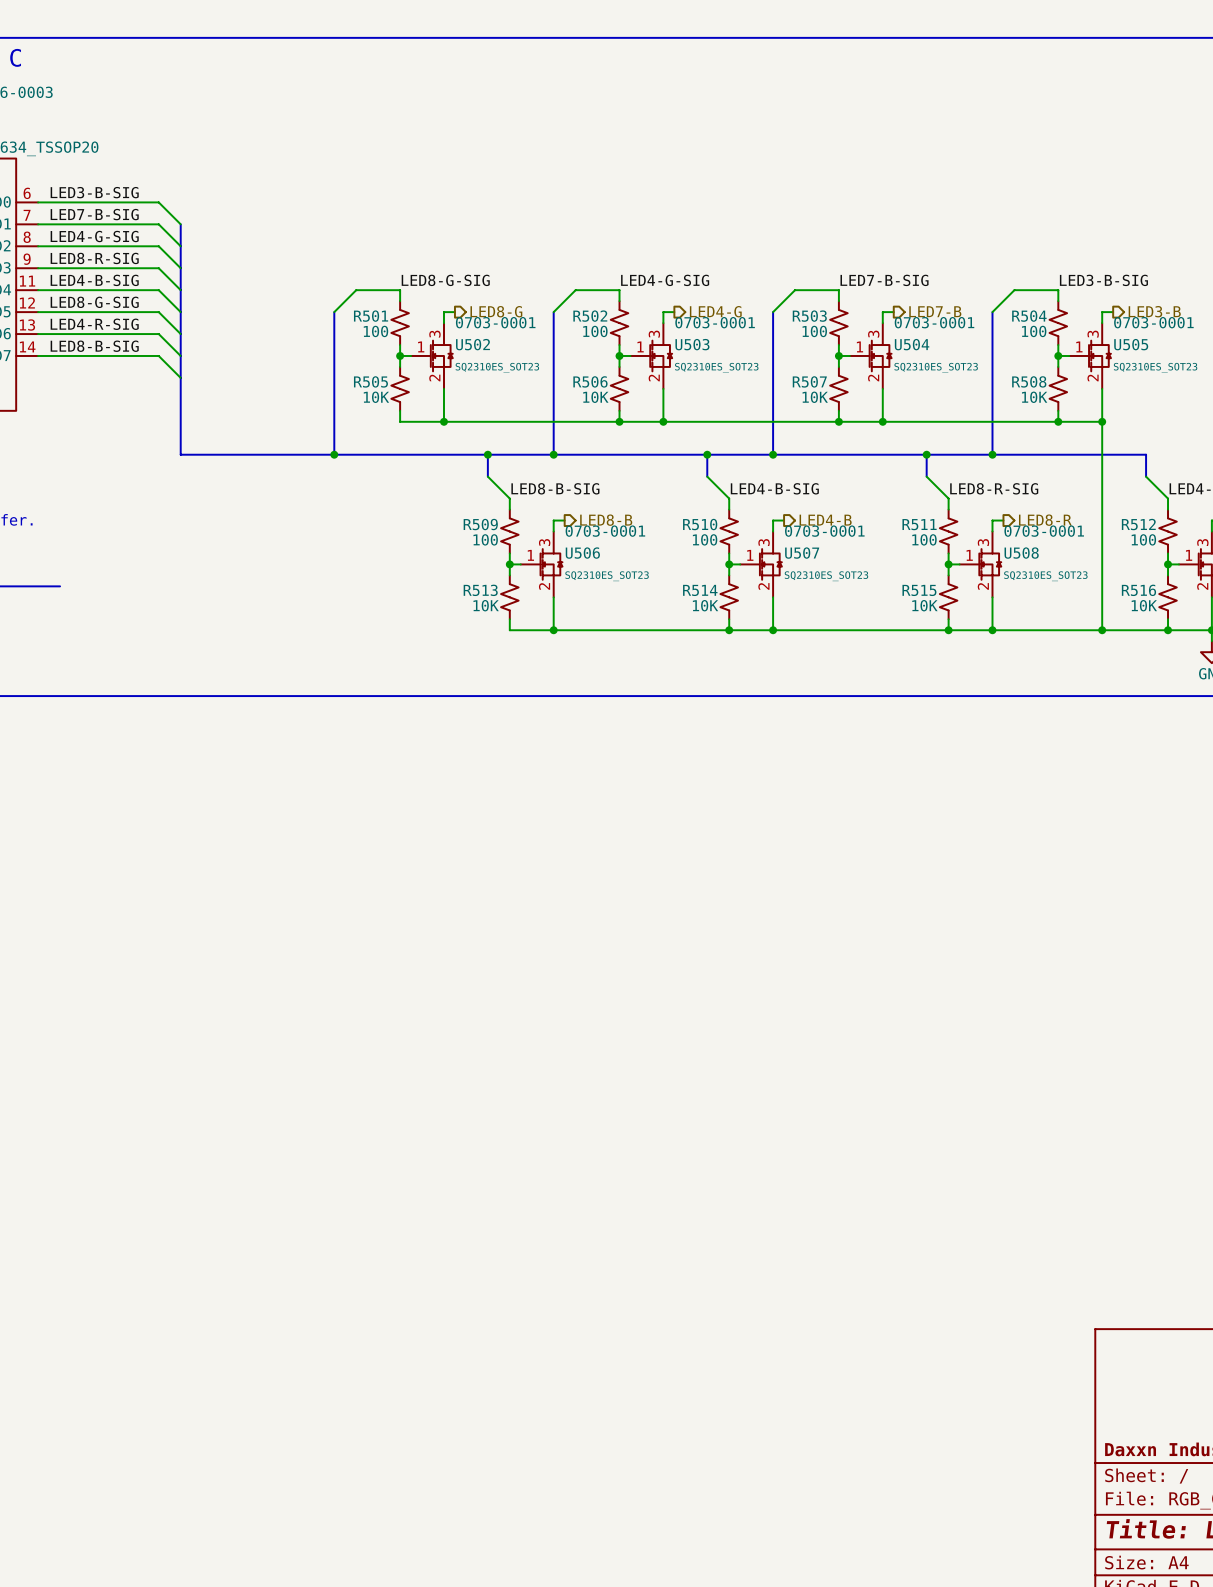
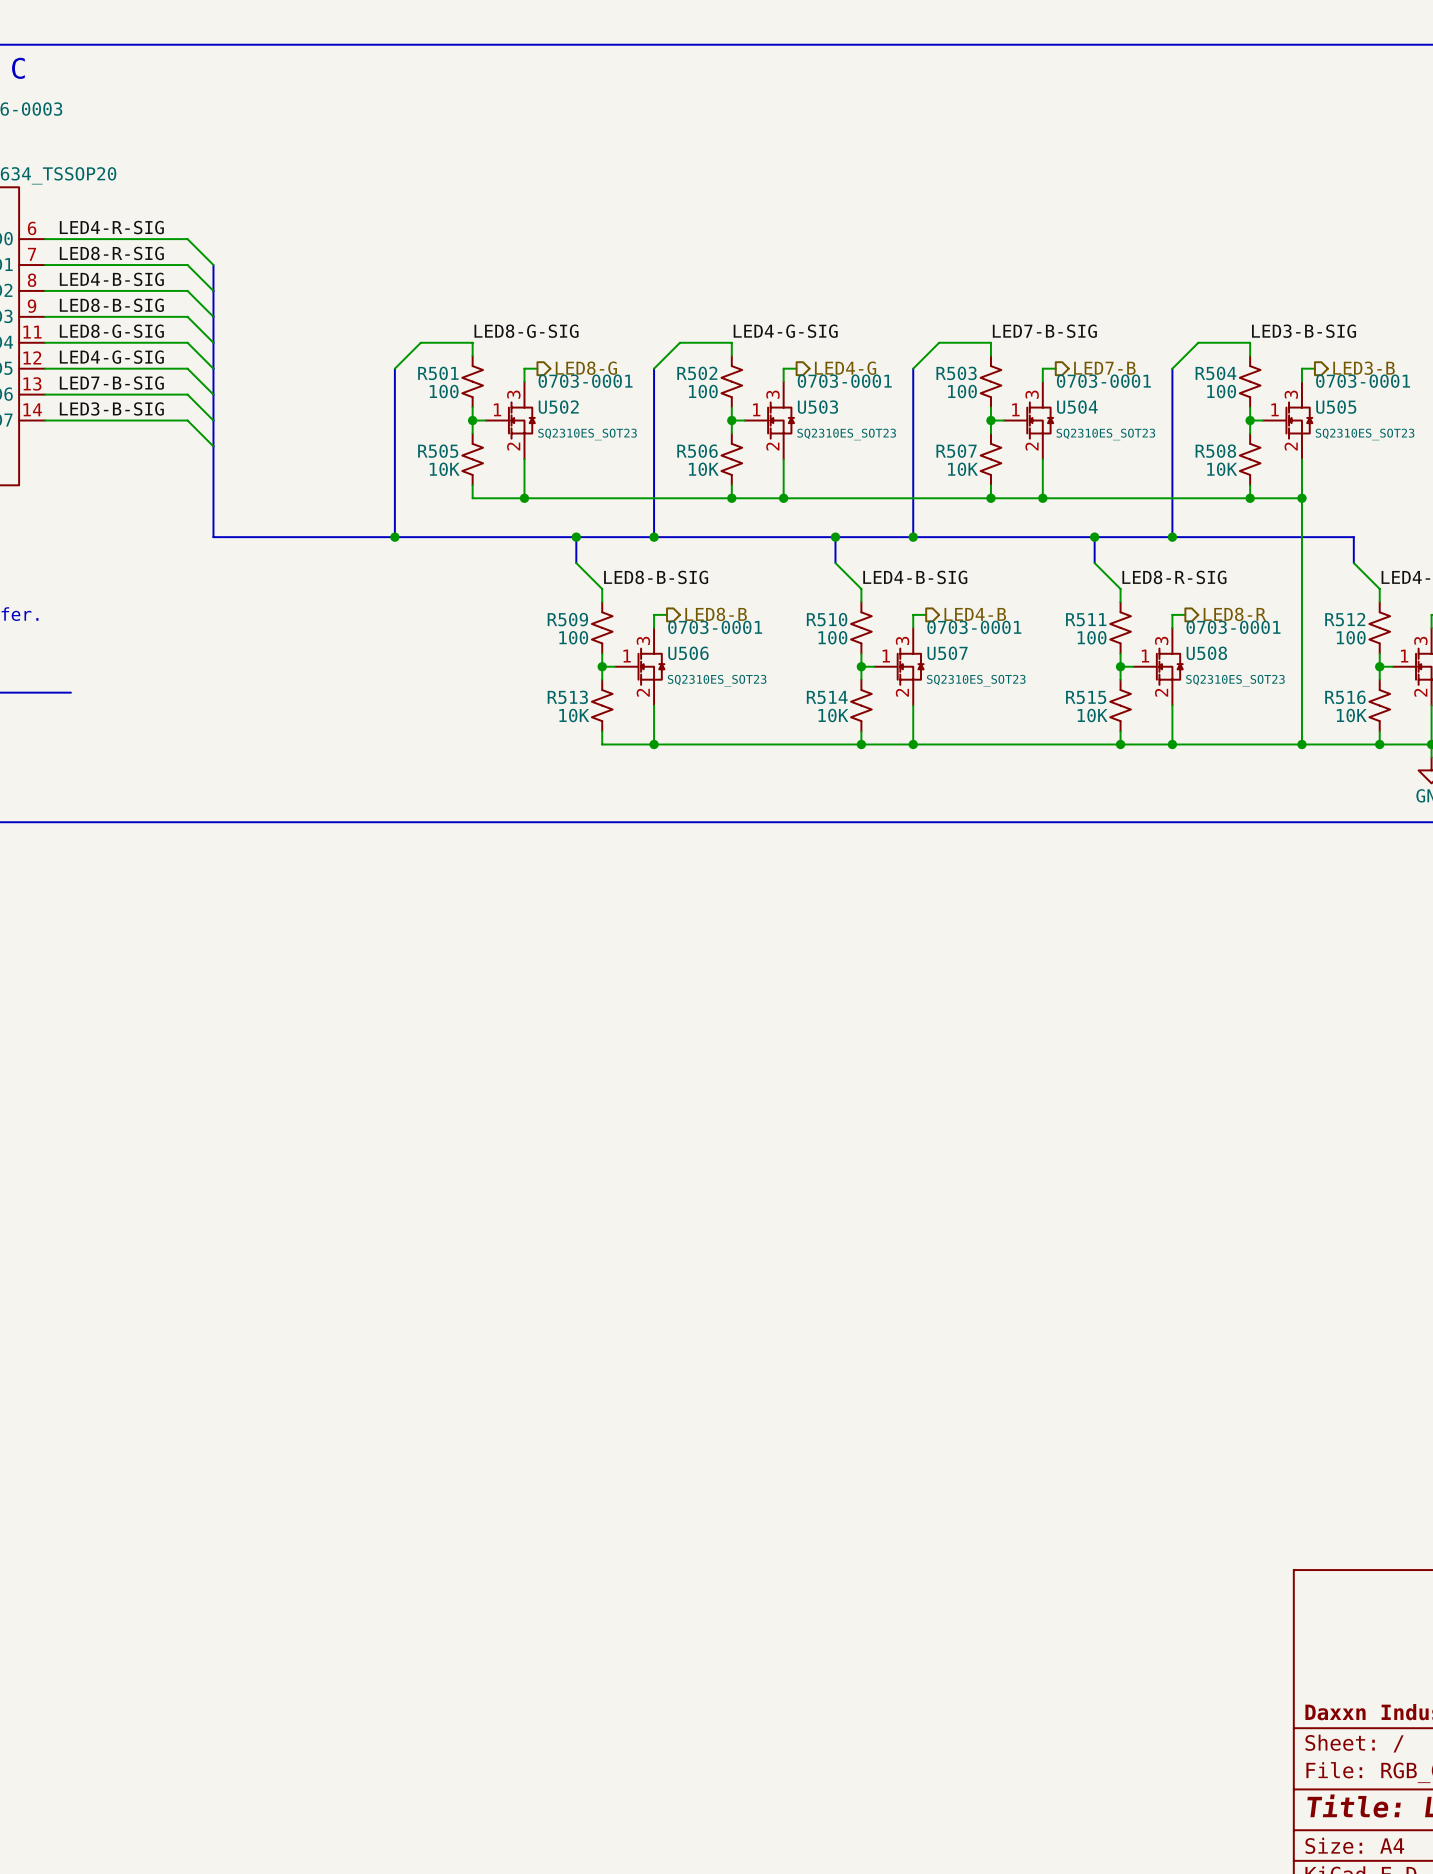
label: LED3-B-SIG (94, 192) -> LED4-R-SIG (111, 227)
label: LED7-B-SIG (94, 214) -> LED8-R-SIG (111, 253)
label: LED4-G-SIG (94, 236) -> LED4-B-SIG (111, 279)
label: LED8-R-SIG (94, 258) -> LED8-B-SIG (111, 305)
label: LED4-B-SIG (94, 280) -> LED8-G-SIG (111, 331)
label: LED8-G-SIG (94, 302) -> LED4-G-SIG (111, 357)
label: LED4-R-SIG (94, 324) -> LED7-B-SIG (111, 383)
label: LED8-B-SIG (94, 346) -> LED3-B-SIG (111, 408)

